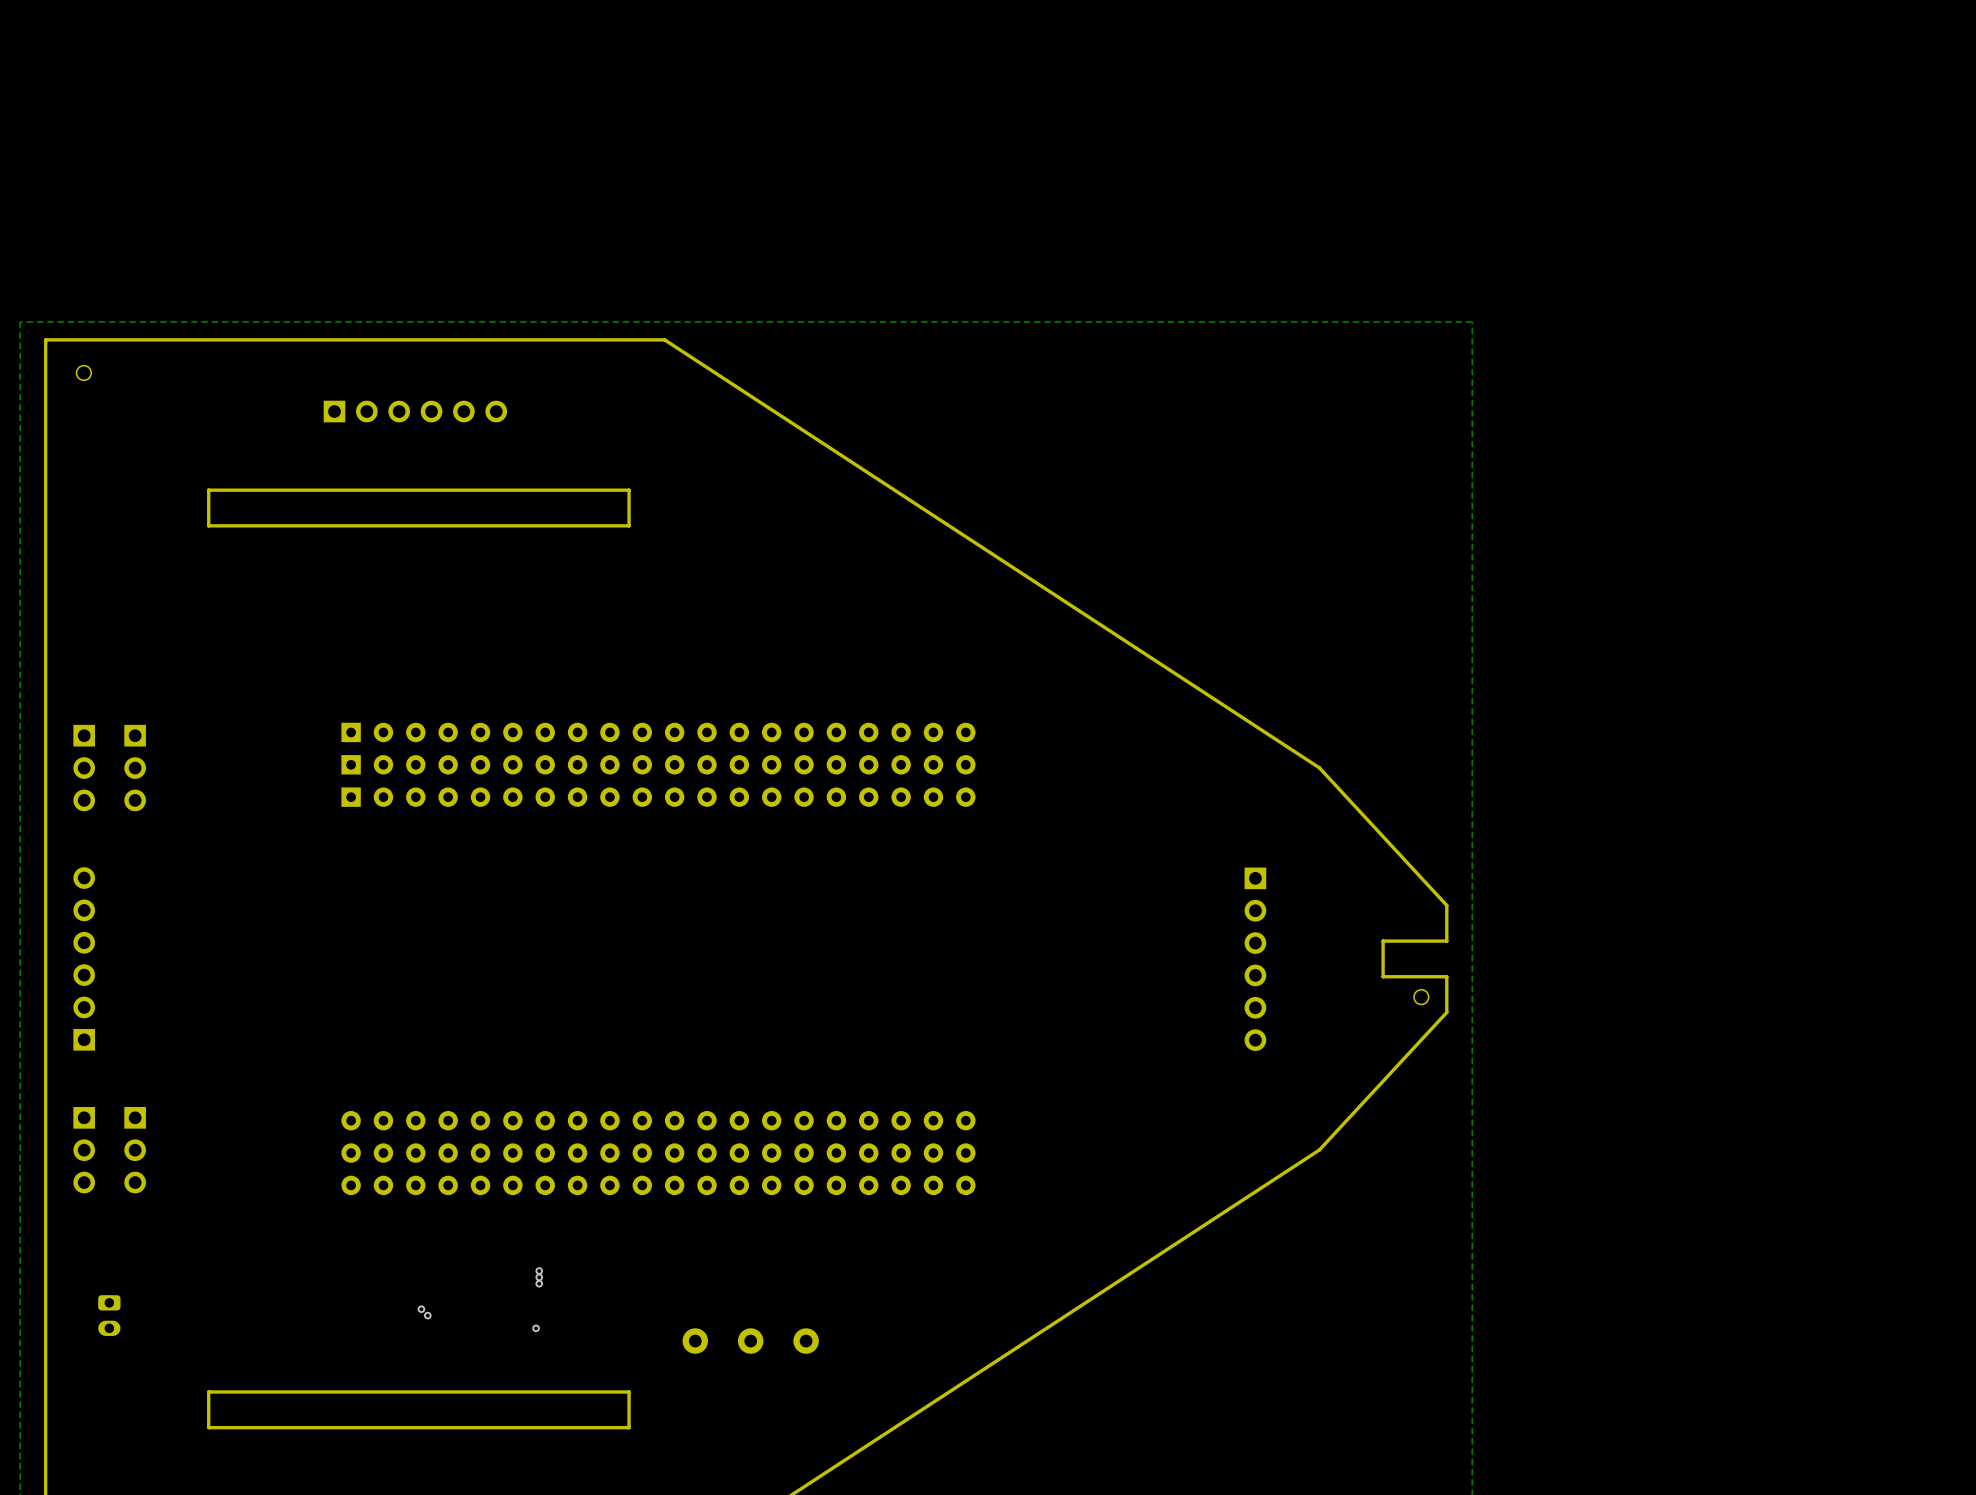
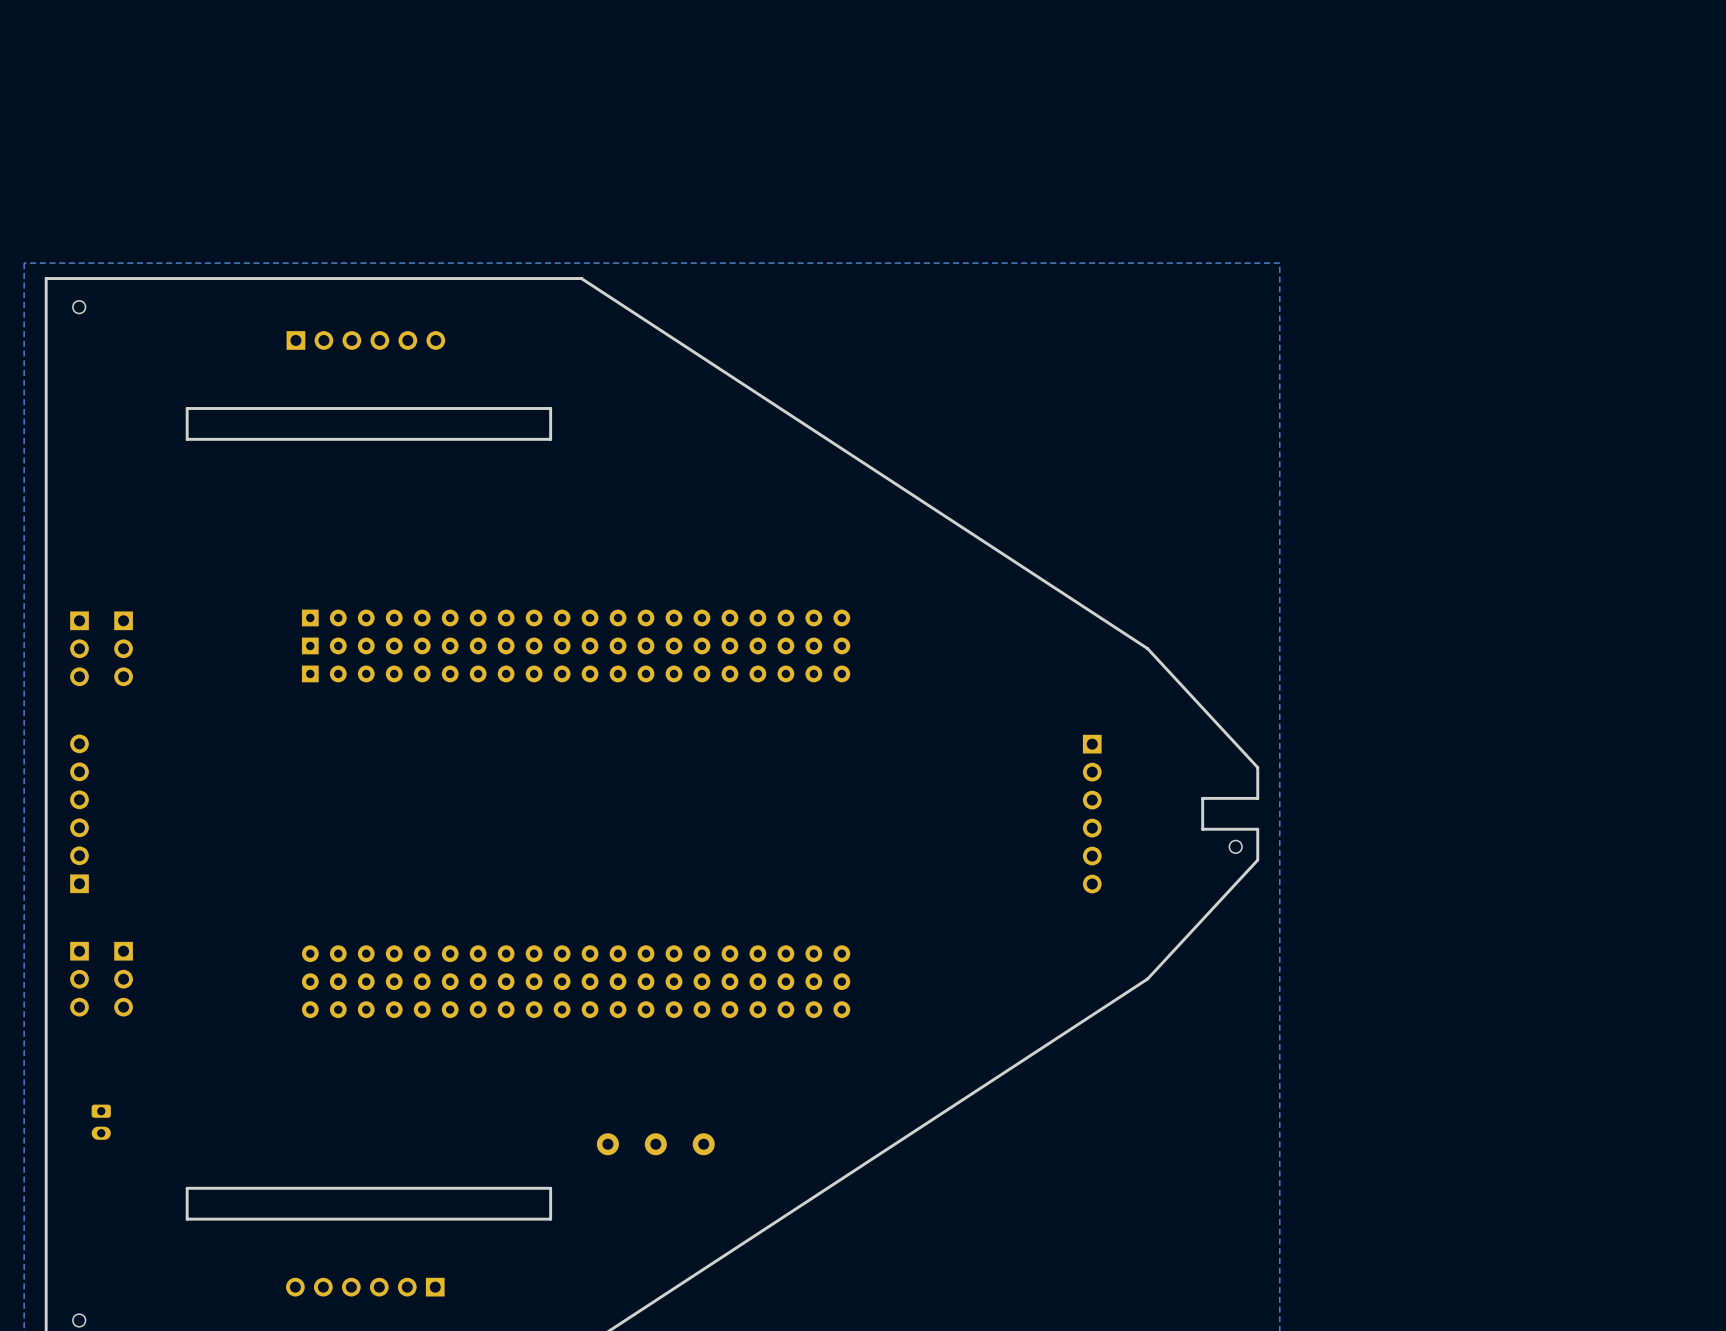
via: (539, 1270) -> none
via: (539, 1277) -> none
via: (539, 1283) -> none
via: (421, 1309) -> none
via: (427, 1315) -> none
via: (536, 1328) -> none

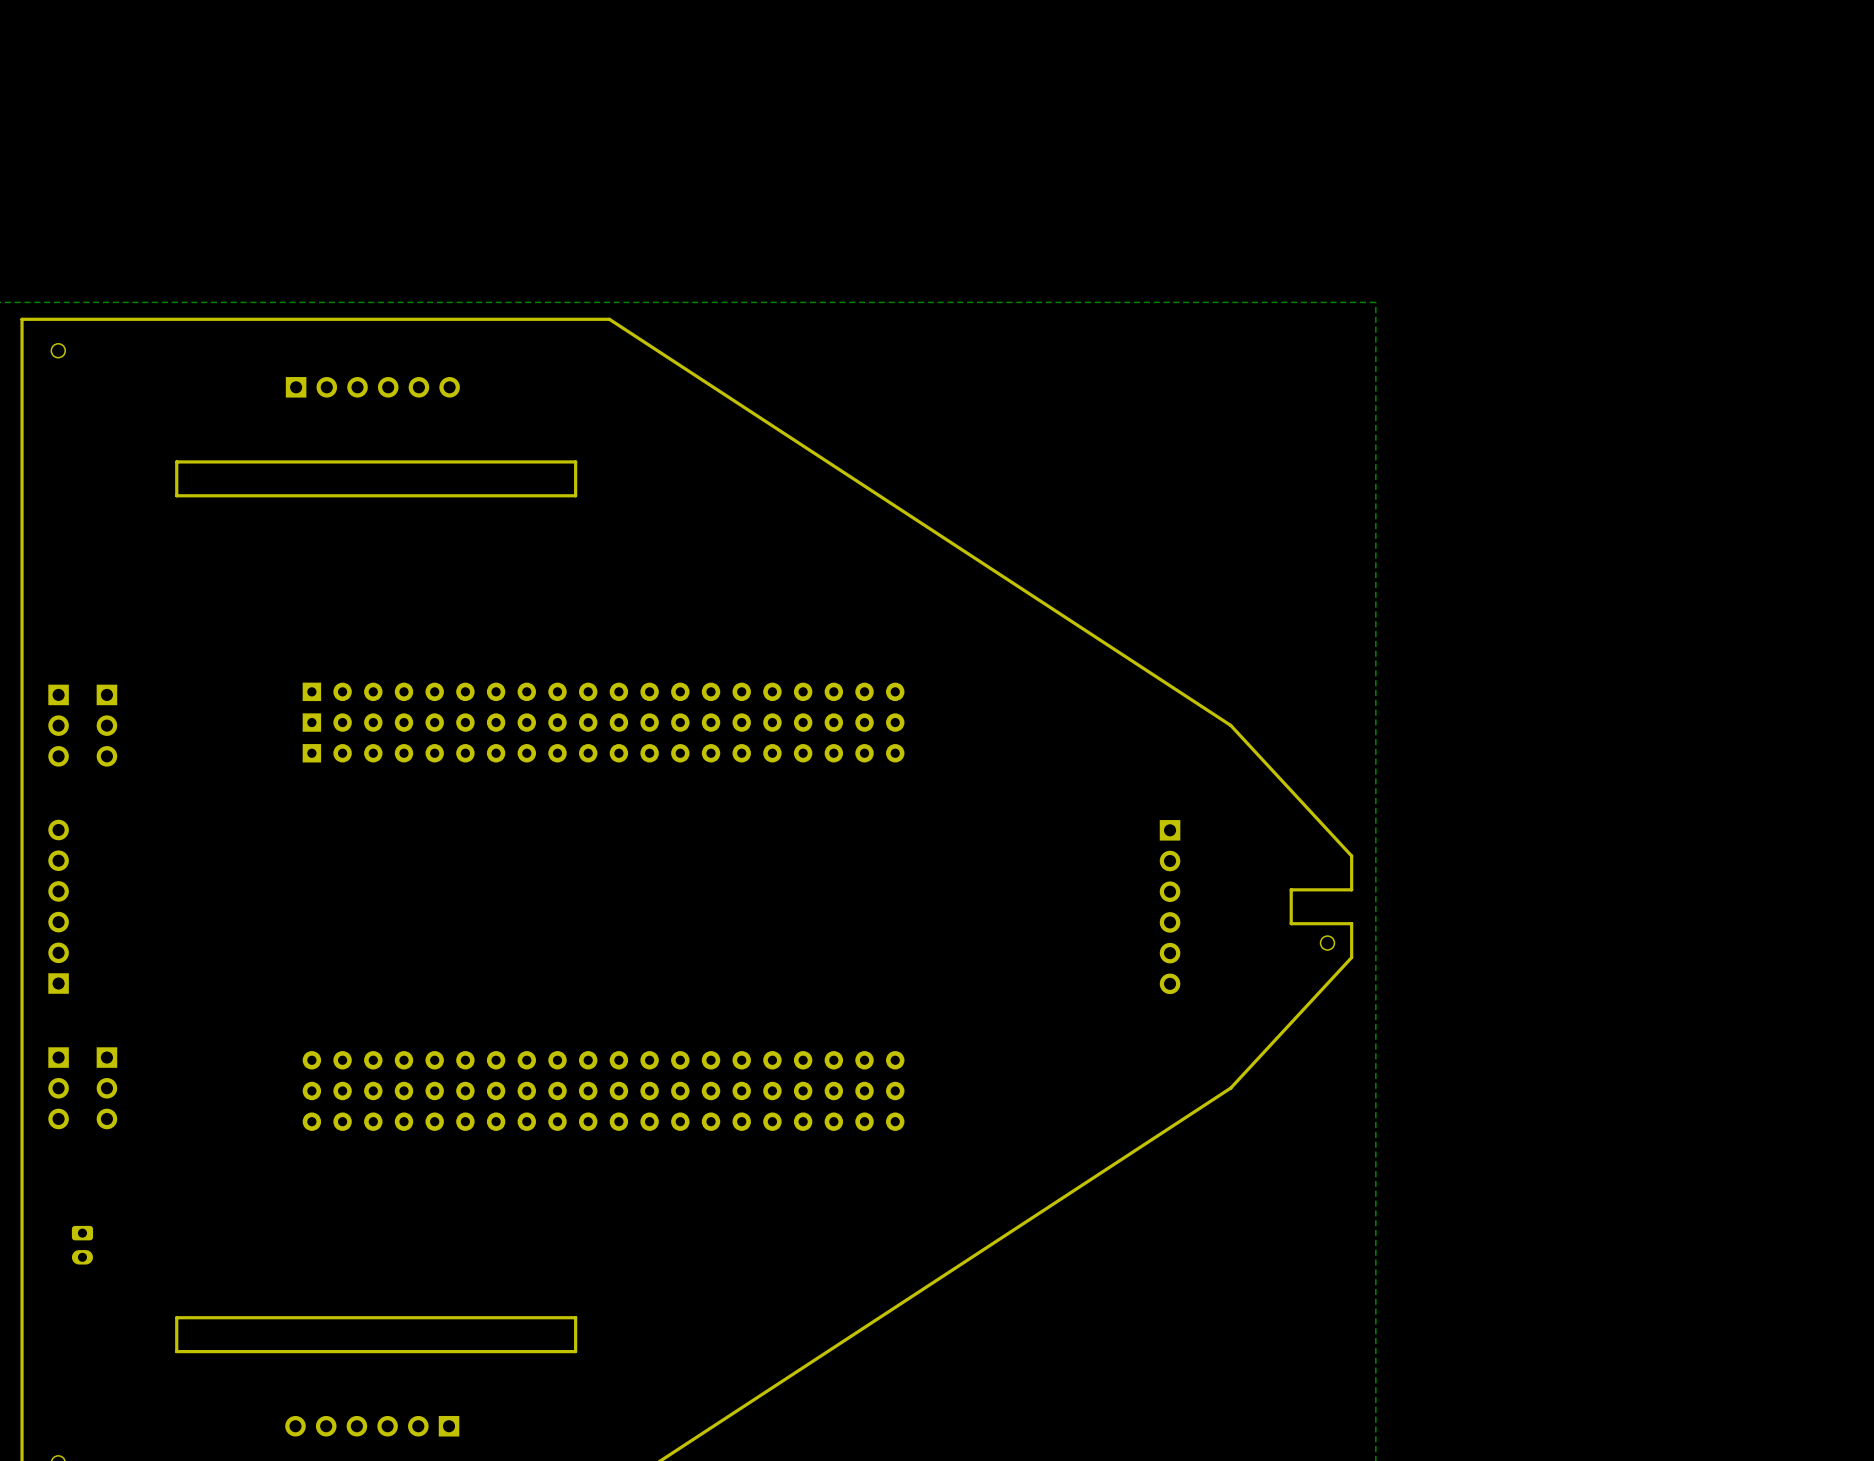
part: (607, 1144) -> none
part: (655, 1144) -> none
part: (703, 1144) -> none

